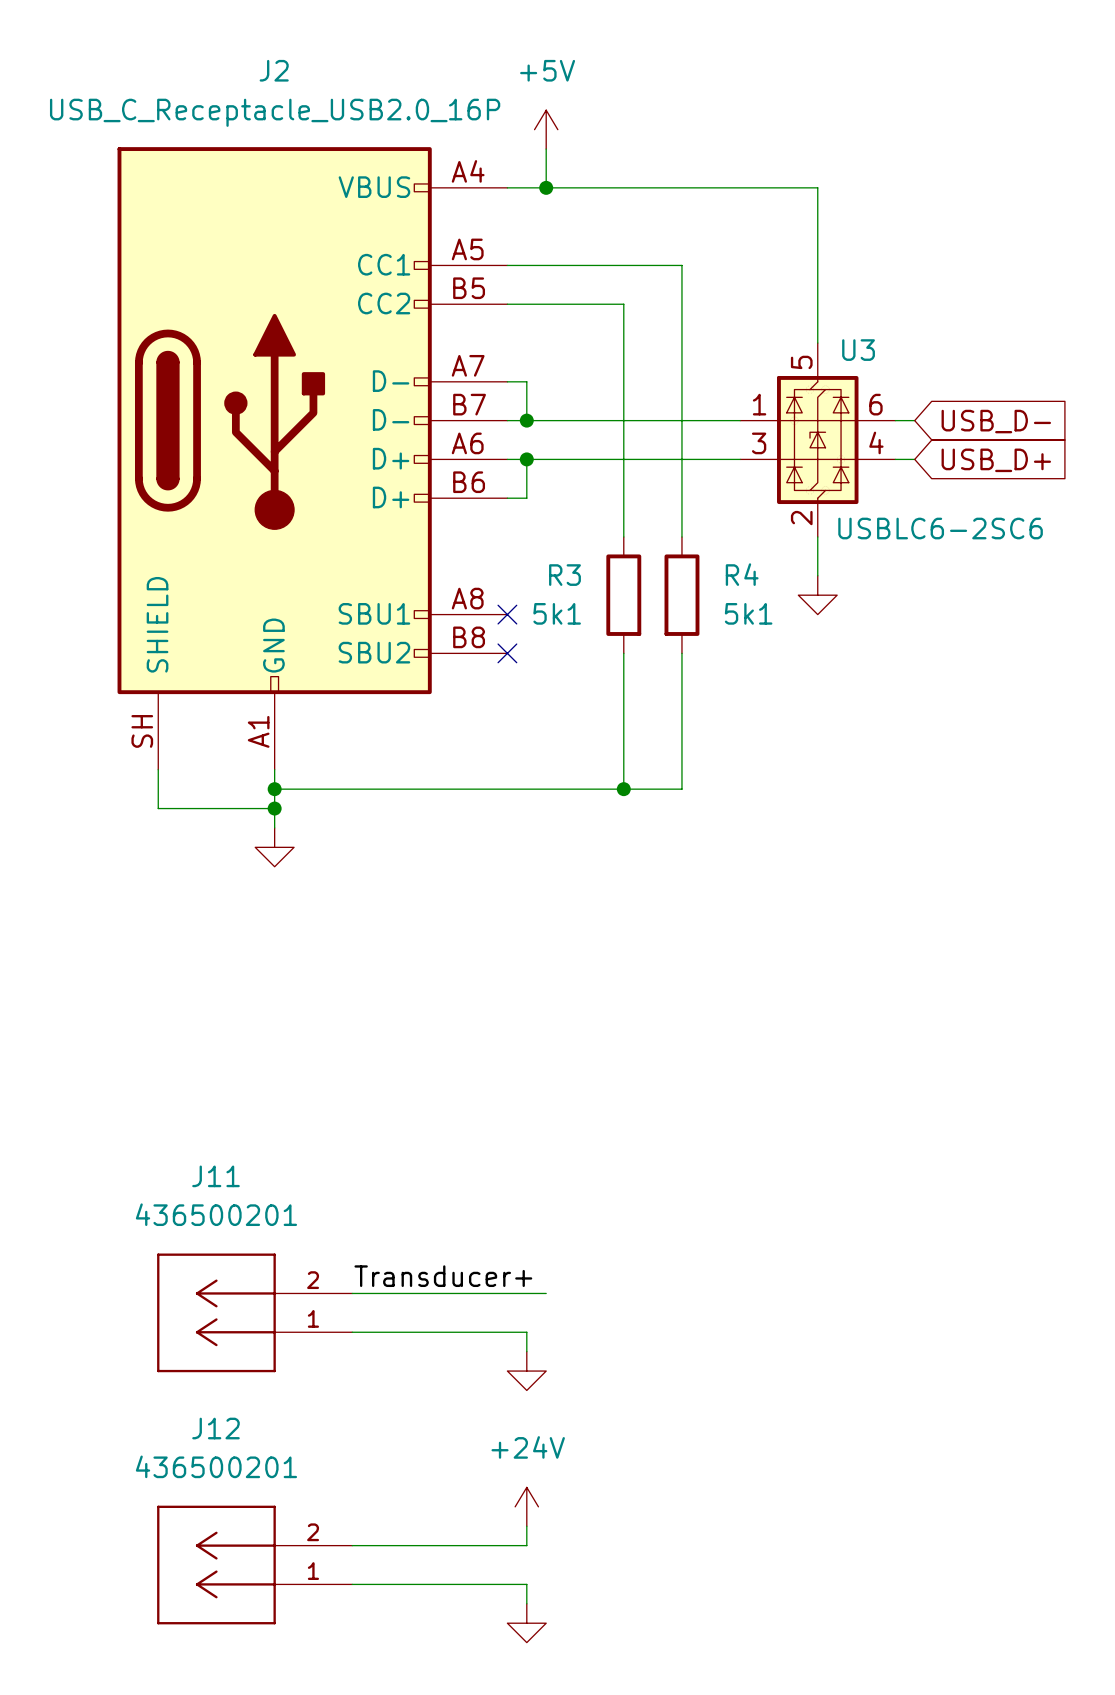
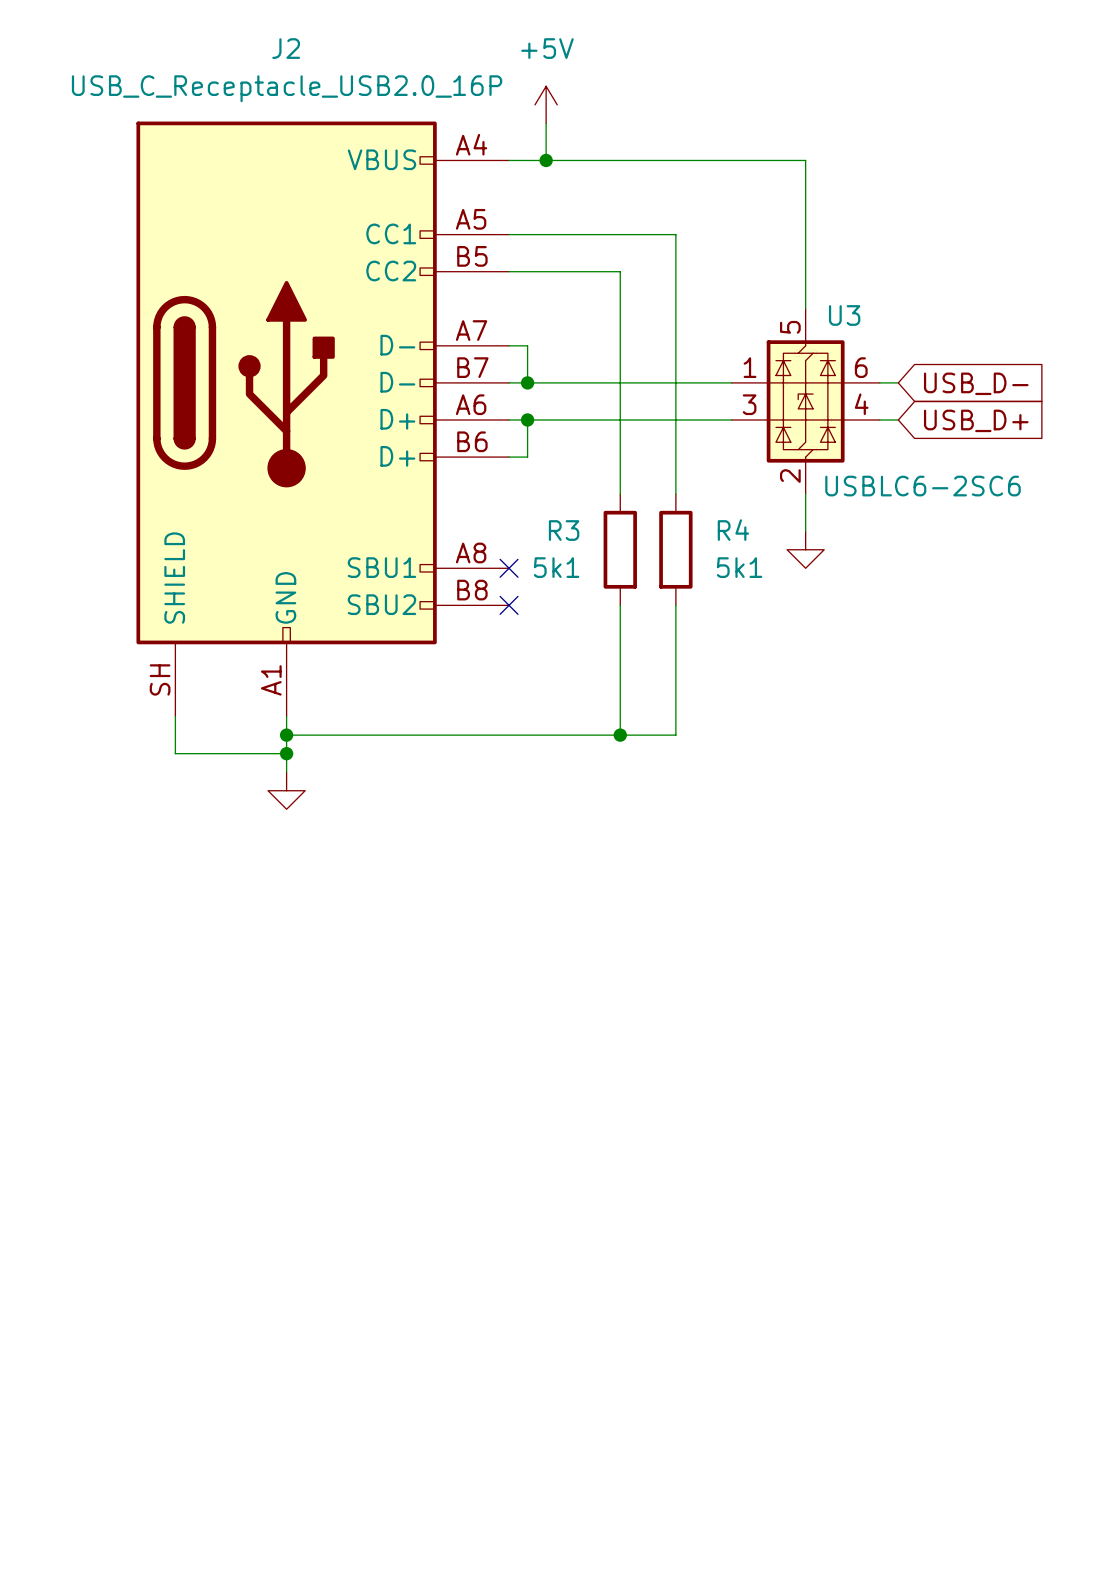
label: Transducer+ (443, 1276) -> none
wire: (352, 1293) (546, 1293) -> none
J11: 436500201 (254, 1312) -> none
wire: (352, 1332) (526, 1332) (526, 1351) -> none
power symbol: (526, 1371) -> none
power symbol: +24V (526, 1506) -> none
wire: (526, 1526) (526, 1545) (352, 1545) -> none
J12: 436500201 (254, 1565) -> none
wire: (352, 1584) (526, 1584) (526, 1603) -> none
power symbol: (526, 1623) -> none

